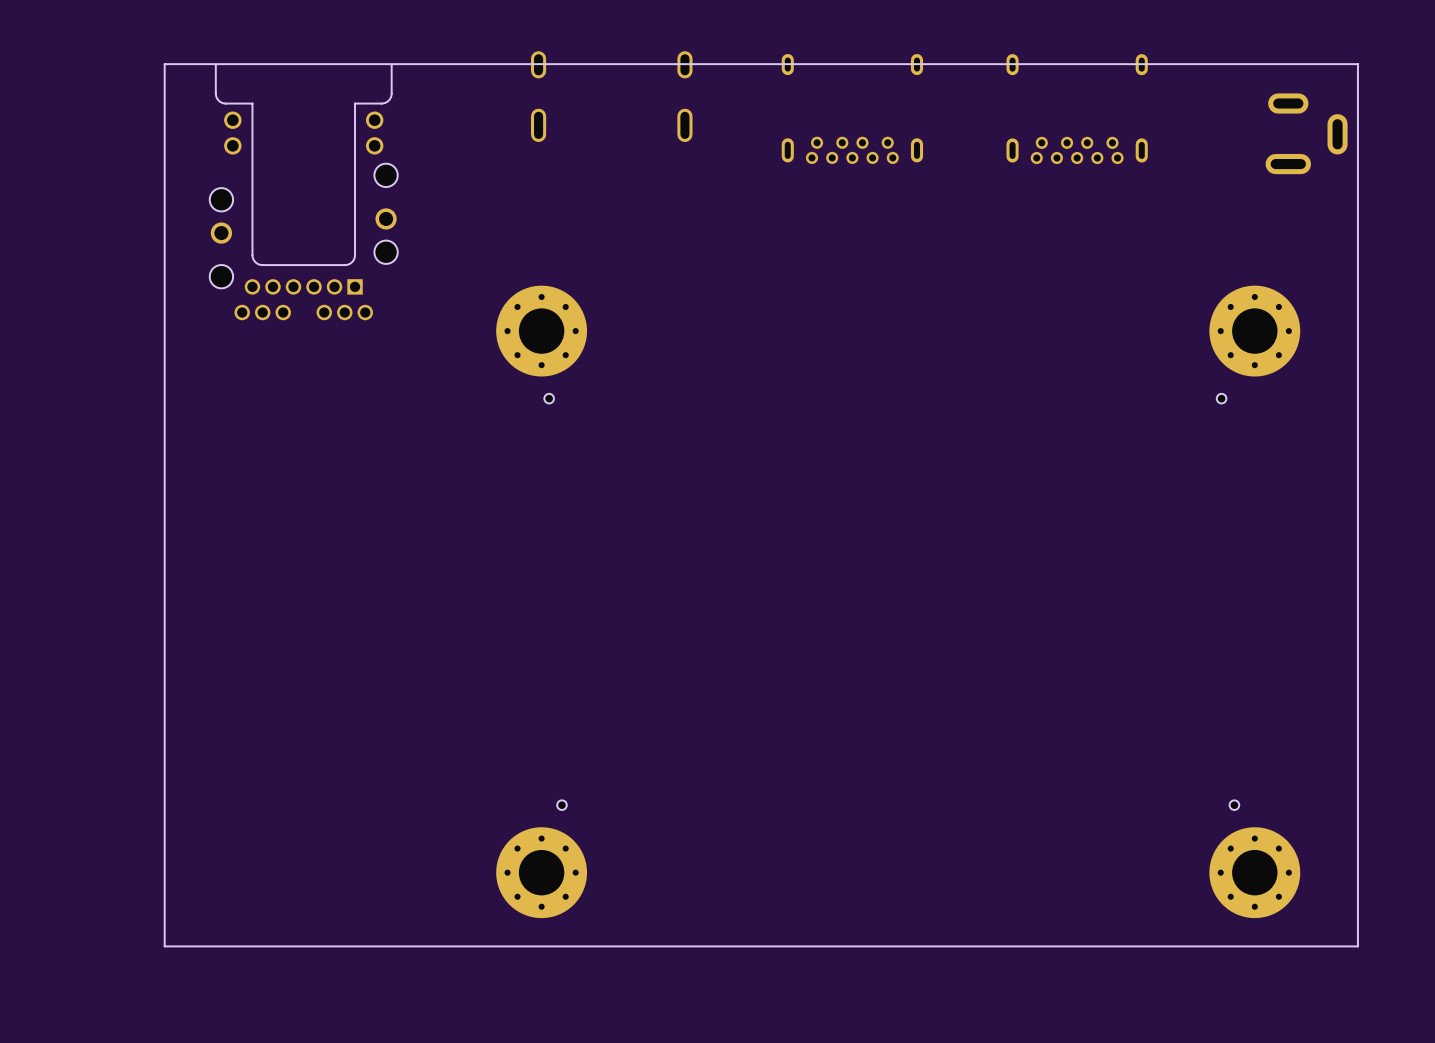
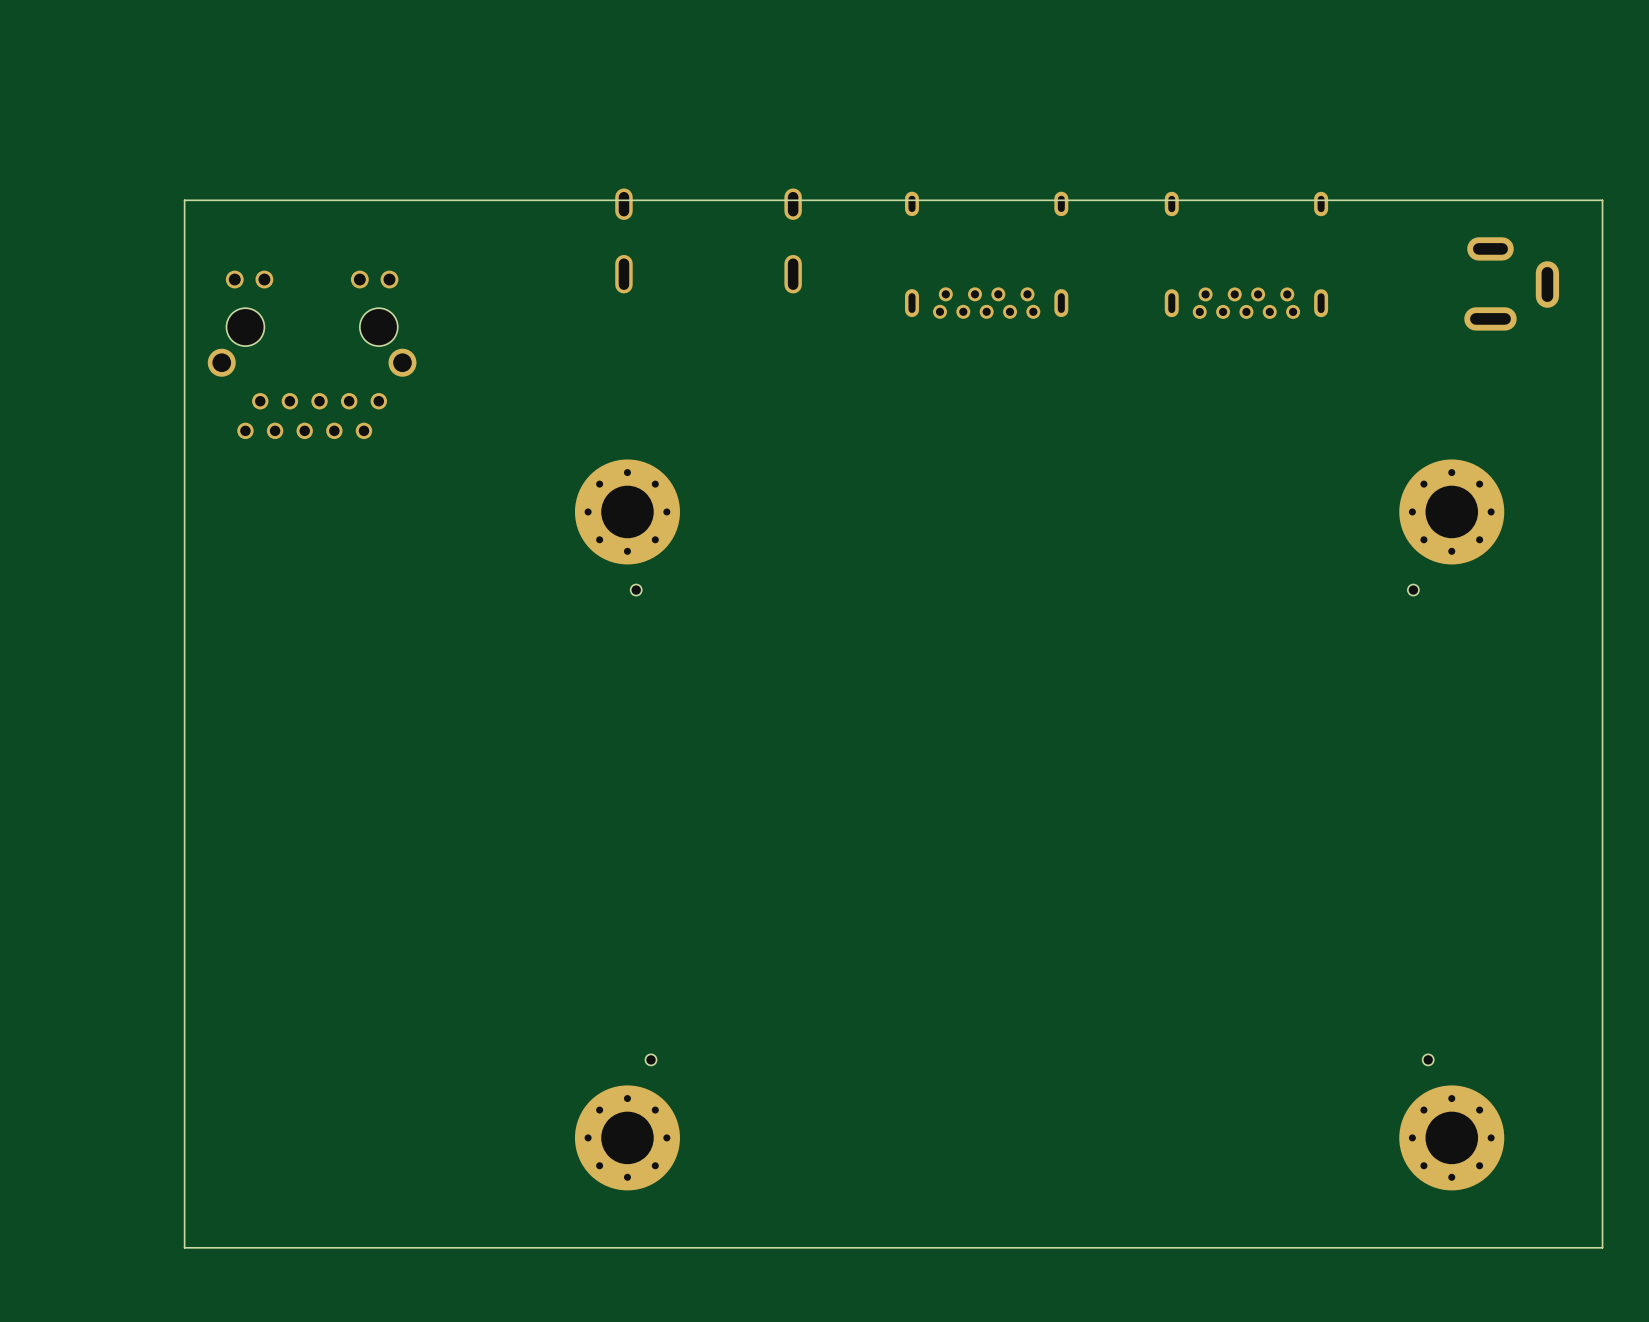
board edge: (1357, 64) (1357, 946) (164, 946) (164, 64) (1357, 64) -> (1602, 200) (1602, 1247) (184, 1247) (184, 200) (1602, 200)
part: (303, 192) -> none
part: none -> (312, 354)

